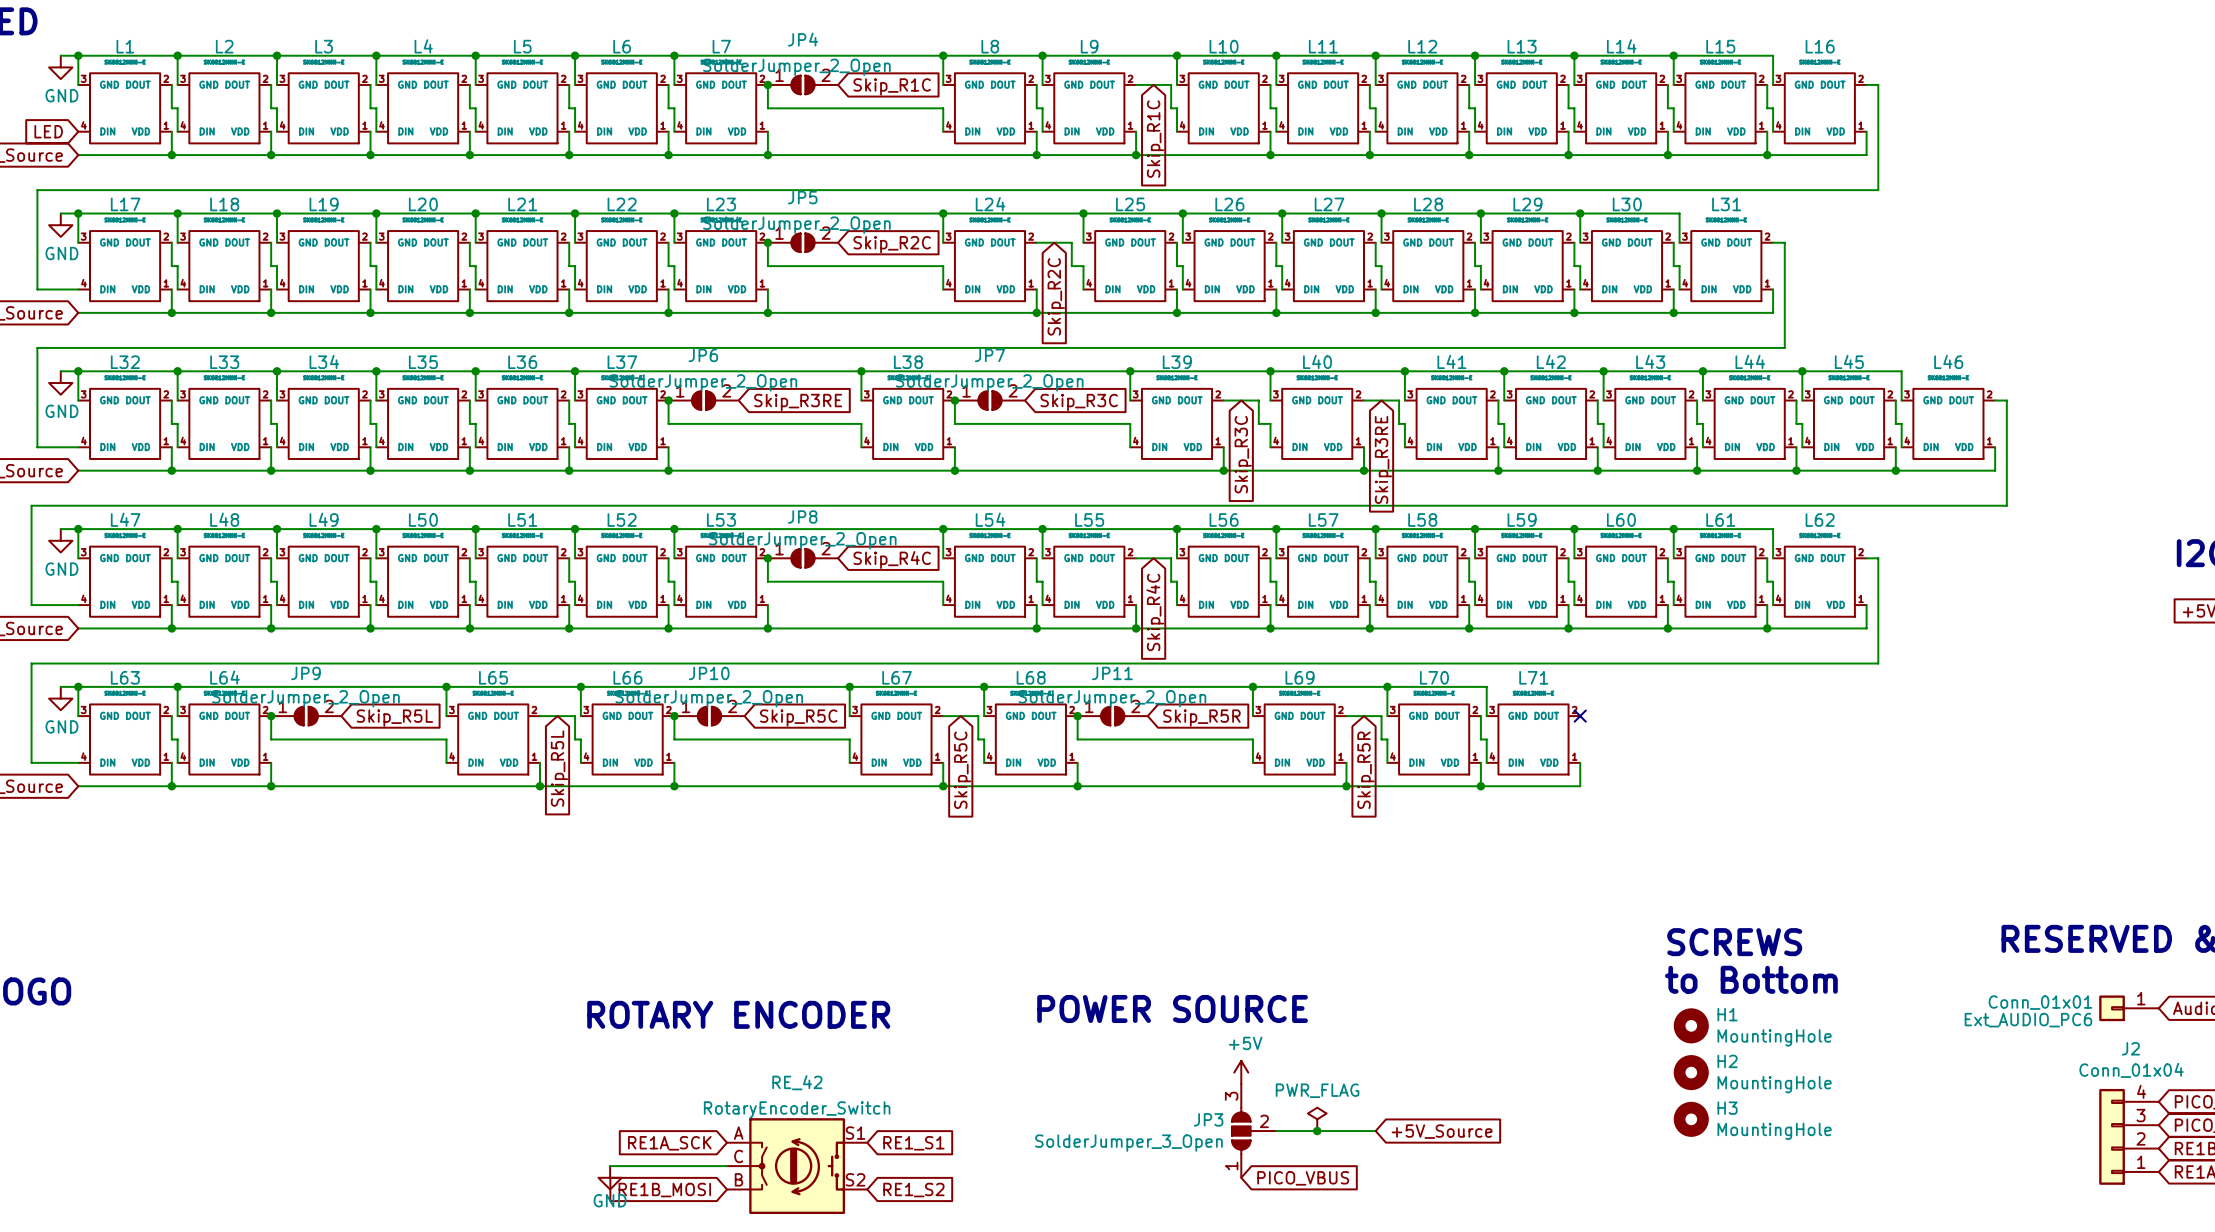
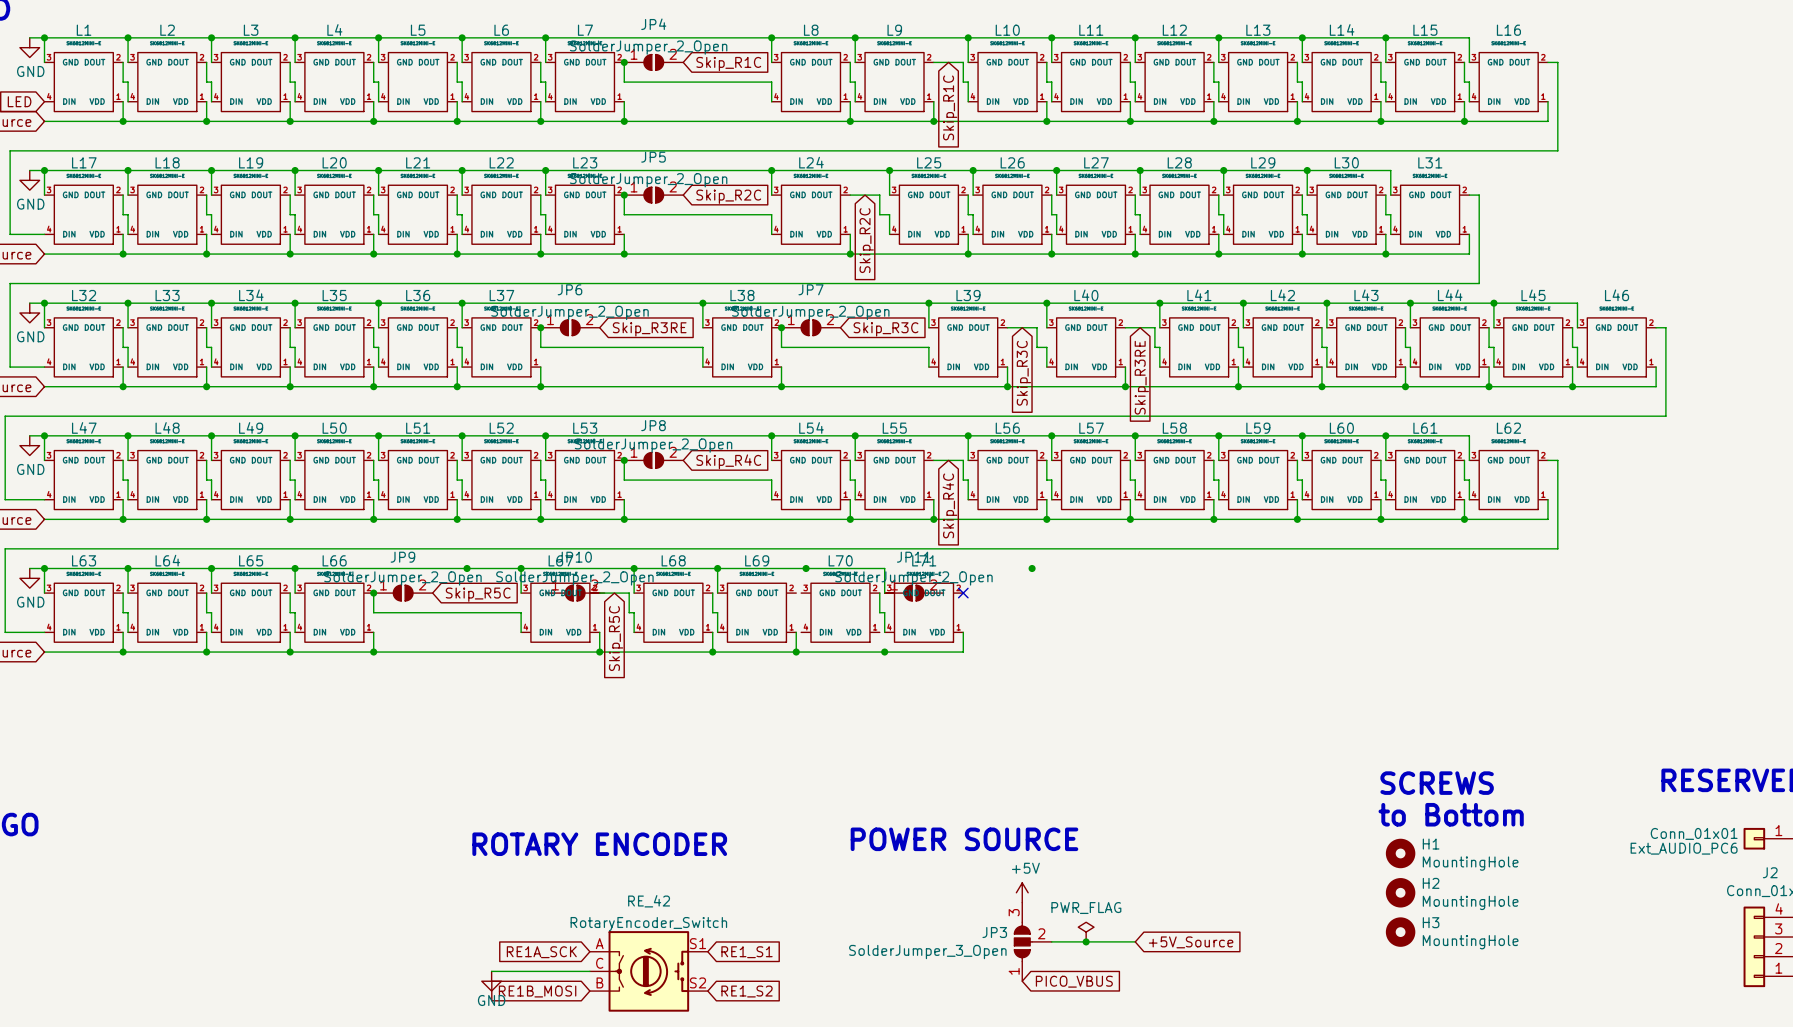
junction: none -> (295, 568)
wire: (446, 686) (446, 716) -> (211, 568) (211, 593)
junction: (446, 686) -> none
wire: (580, 686) (580, 716) -> (295, 568) (295, 593)
junction: none -> (634, 568)
wire: (849, 686) (849, 716) -> (521, 568) (521, 593)
junction position: (849, 686) -> (717, 568)
wire: none -> (717, 568) (717, 593)
wire: (984, 686) (984, 716) -> (634, 568) (634, 593)
wire: (1077, 686) (1486, 686) (1486, 716) -> none
wire: (1252, 686) (1252, 716) -> none
wire: (1387, 686) (1387, 716) -> none
junction: (1387, 686) -> none
junction position: (271, 716) -> (211, 568)
JP9 position: (306, 716) -> (403, 593)
wire: none -> (290, 593) (290, 612)
junction: none -> (373, 593)
wire: (539, 716) (575, 716) (575, 739) -> (373, 593) (373, 612) (462, 612)
wire: (674, 716) (674, 739) (773, 739) -> (599, 593) (629, 593) (629, 612)
junction position: (674, 716) -> (521, 568)
wire: none -> (712, 593) (712, 612) (717, 612) (717, 632)
wire: (943, 716) (978, 716) (978, 739) (984, 739) (984, 762) -> none
wire: (1077, 716) (1077, 739) (1252, 739) (1252, 762) -> (884, 593) (884, 568)
junction: (1077, 716) -> none
no-connect mark: none -> (963, 593)
wire: (1346, 716) (1381, 716) (1381, 739) (1387, 739) (1387, 762) -> none
wire: (1480, 716) (1480, 739) (1486, 739) (1486, 762) -> none
no-connect mark: (1580, 716) -> none
global label: Skip_R5L (394, 718) -> none
global label rotation: 0° (798, 718) -> 90° clockwise (616, 638)
global label: Skip_R5R (1201, 718) -> none
wire: (277, 739) (370, 739) -> (211, 612) (211, 632)
wire: (376, 739) (446, 739) (446, 762) -> (295, 612) (295, 632)
L65 position: (493, 739) -> (250, 612)
wire: (580, 739) (580, 762) -> (467, 612) (521, 612) (521, 632)
L66 position: (627, 739) -> (334, 612)
wire: (779, 739) (849, 739) (849, 762) -> (634, 612) (634, 632)
L67 position: (896, 739) -> (560, 612)
L68 position: (1030, 739) -> (673, 612)
L69 position: (1299, 739) -> (756, 612)
L70 position: (1434, 739) -> (840, 612)
L71 position: (1533, 739) -> (924, 612)
wire: (539, 762) (539, 786) -> (290, 632) (290, 652)
wire: (674, 762) (674, 786) -> (373, 632) (373, 652)
wire: none -> (712, 632) (712, 652)
wire: (943, 762) (943, 786) -> (599, 632) (599, 652)
wire: (1077, 762) (1077, 786) -> (884, 632) (884, 612) (879, 612) (879, 593)
wire: (1346, 762) (1346, 786) -> none
wire: (1480, 762) (1480, 786) -> none
wire: (1580, 762) (1580, 786) (1171, 786) -> (963, 632) (963, 652)
global label: Skip_R5L (559, 768) -> Skip_R5C (478, 594)
global label: Skip_R5C (962, 770) -> none
global label: Skip_R5R (1365, 770) -> none
junction: none -> (290, 652)
junction: none -> (373, 652)
junction: (539, 786) -> none
junction: (674, 786) -> none
junction: none -> (599, 652)
junction: none -> (712, 652)
junction position: (943, 786) -> (796, 652)
junction: (1346, 786) -> none
junction: (1480, 786) -> none

